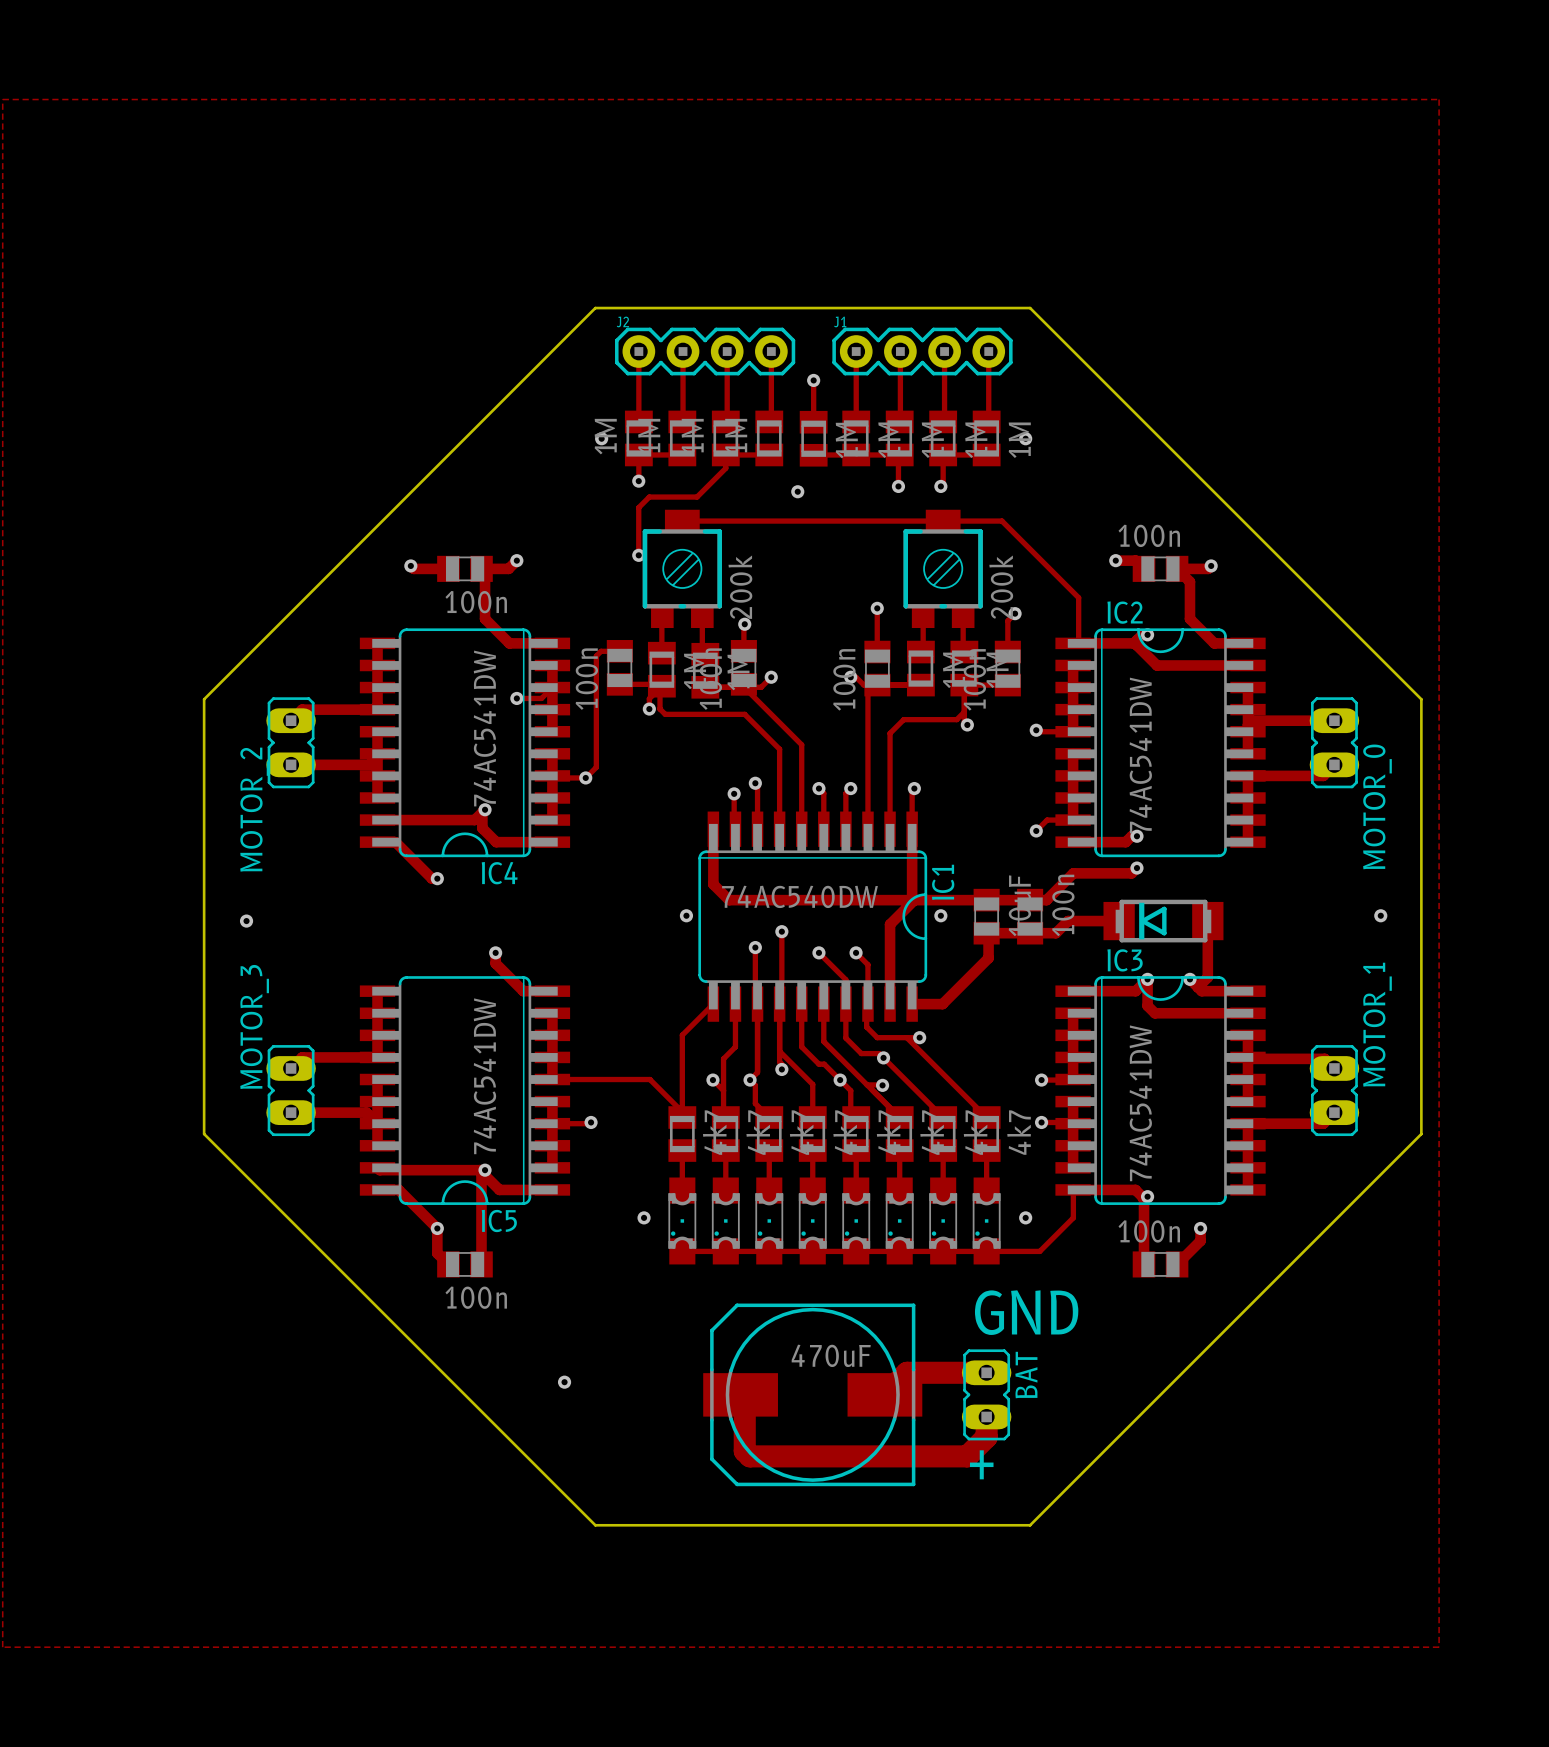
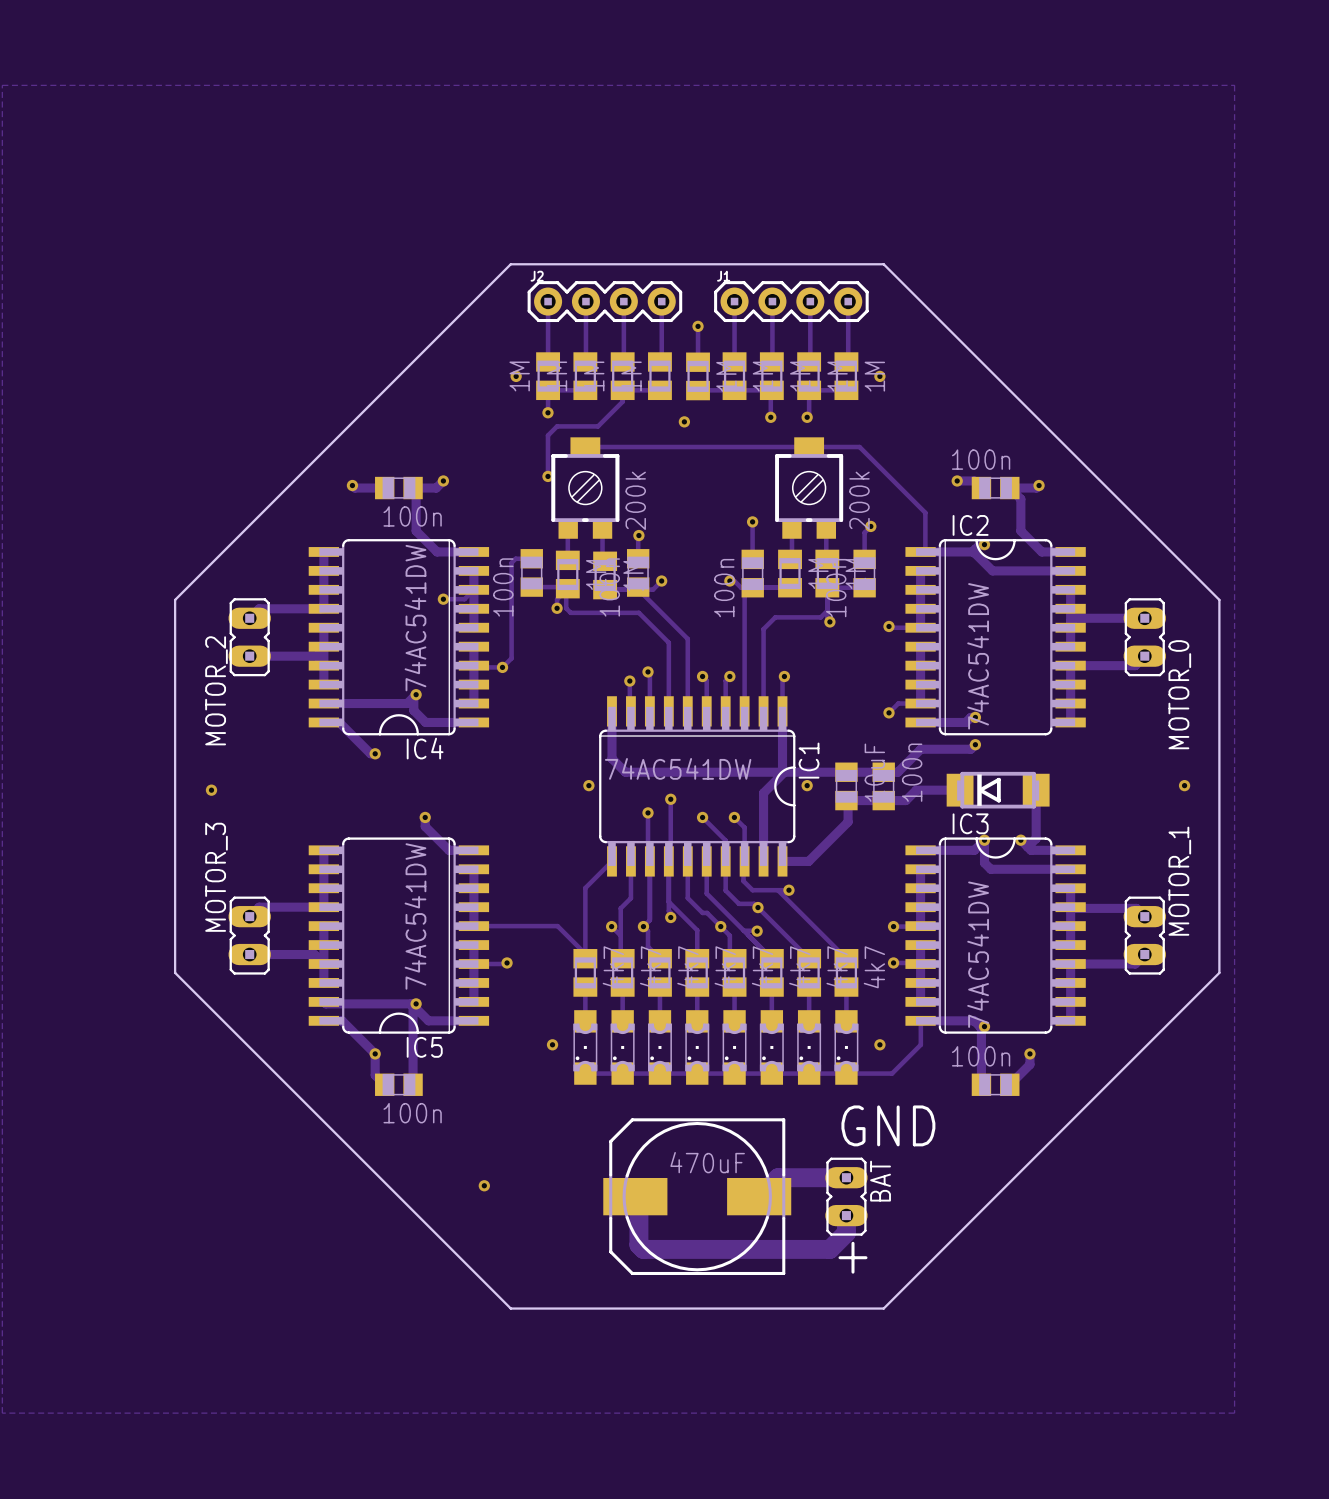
IC1 value: 74AC540DW (799, 896) -> 74AC541DW (678, 768)

